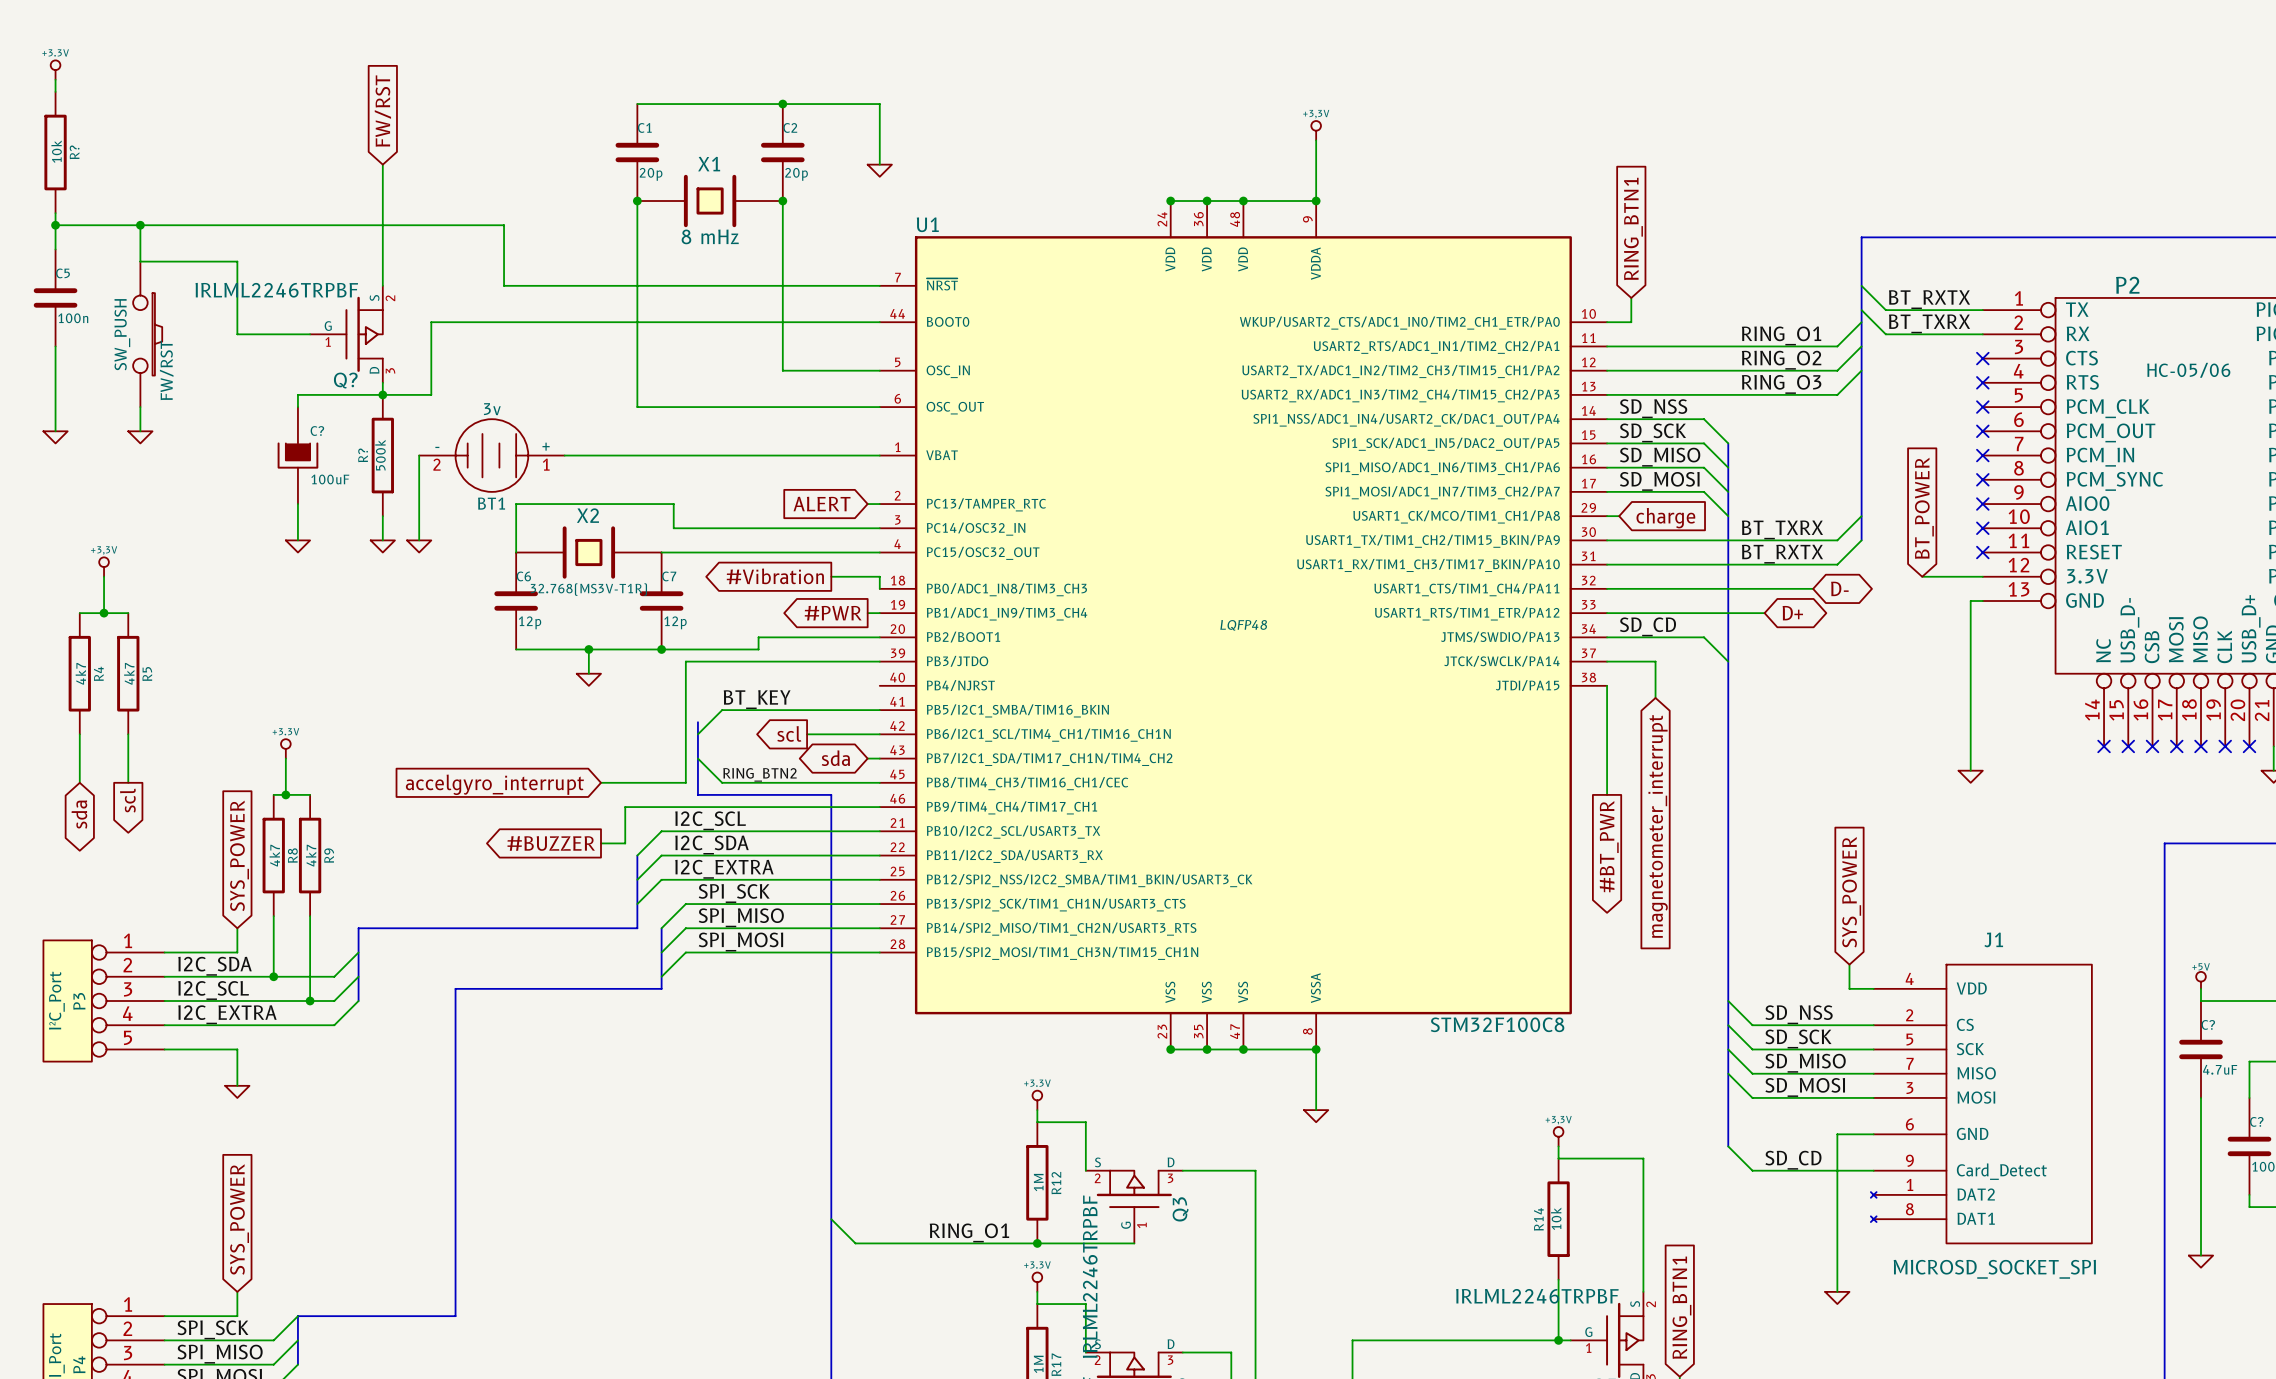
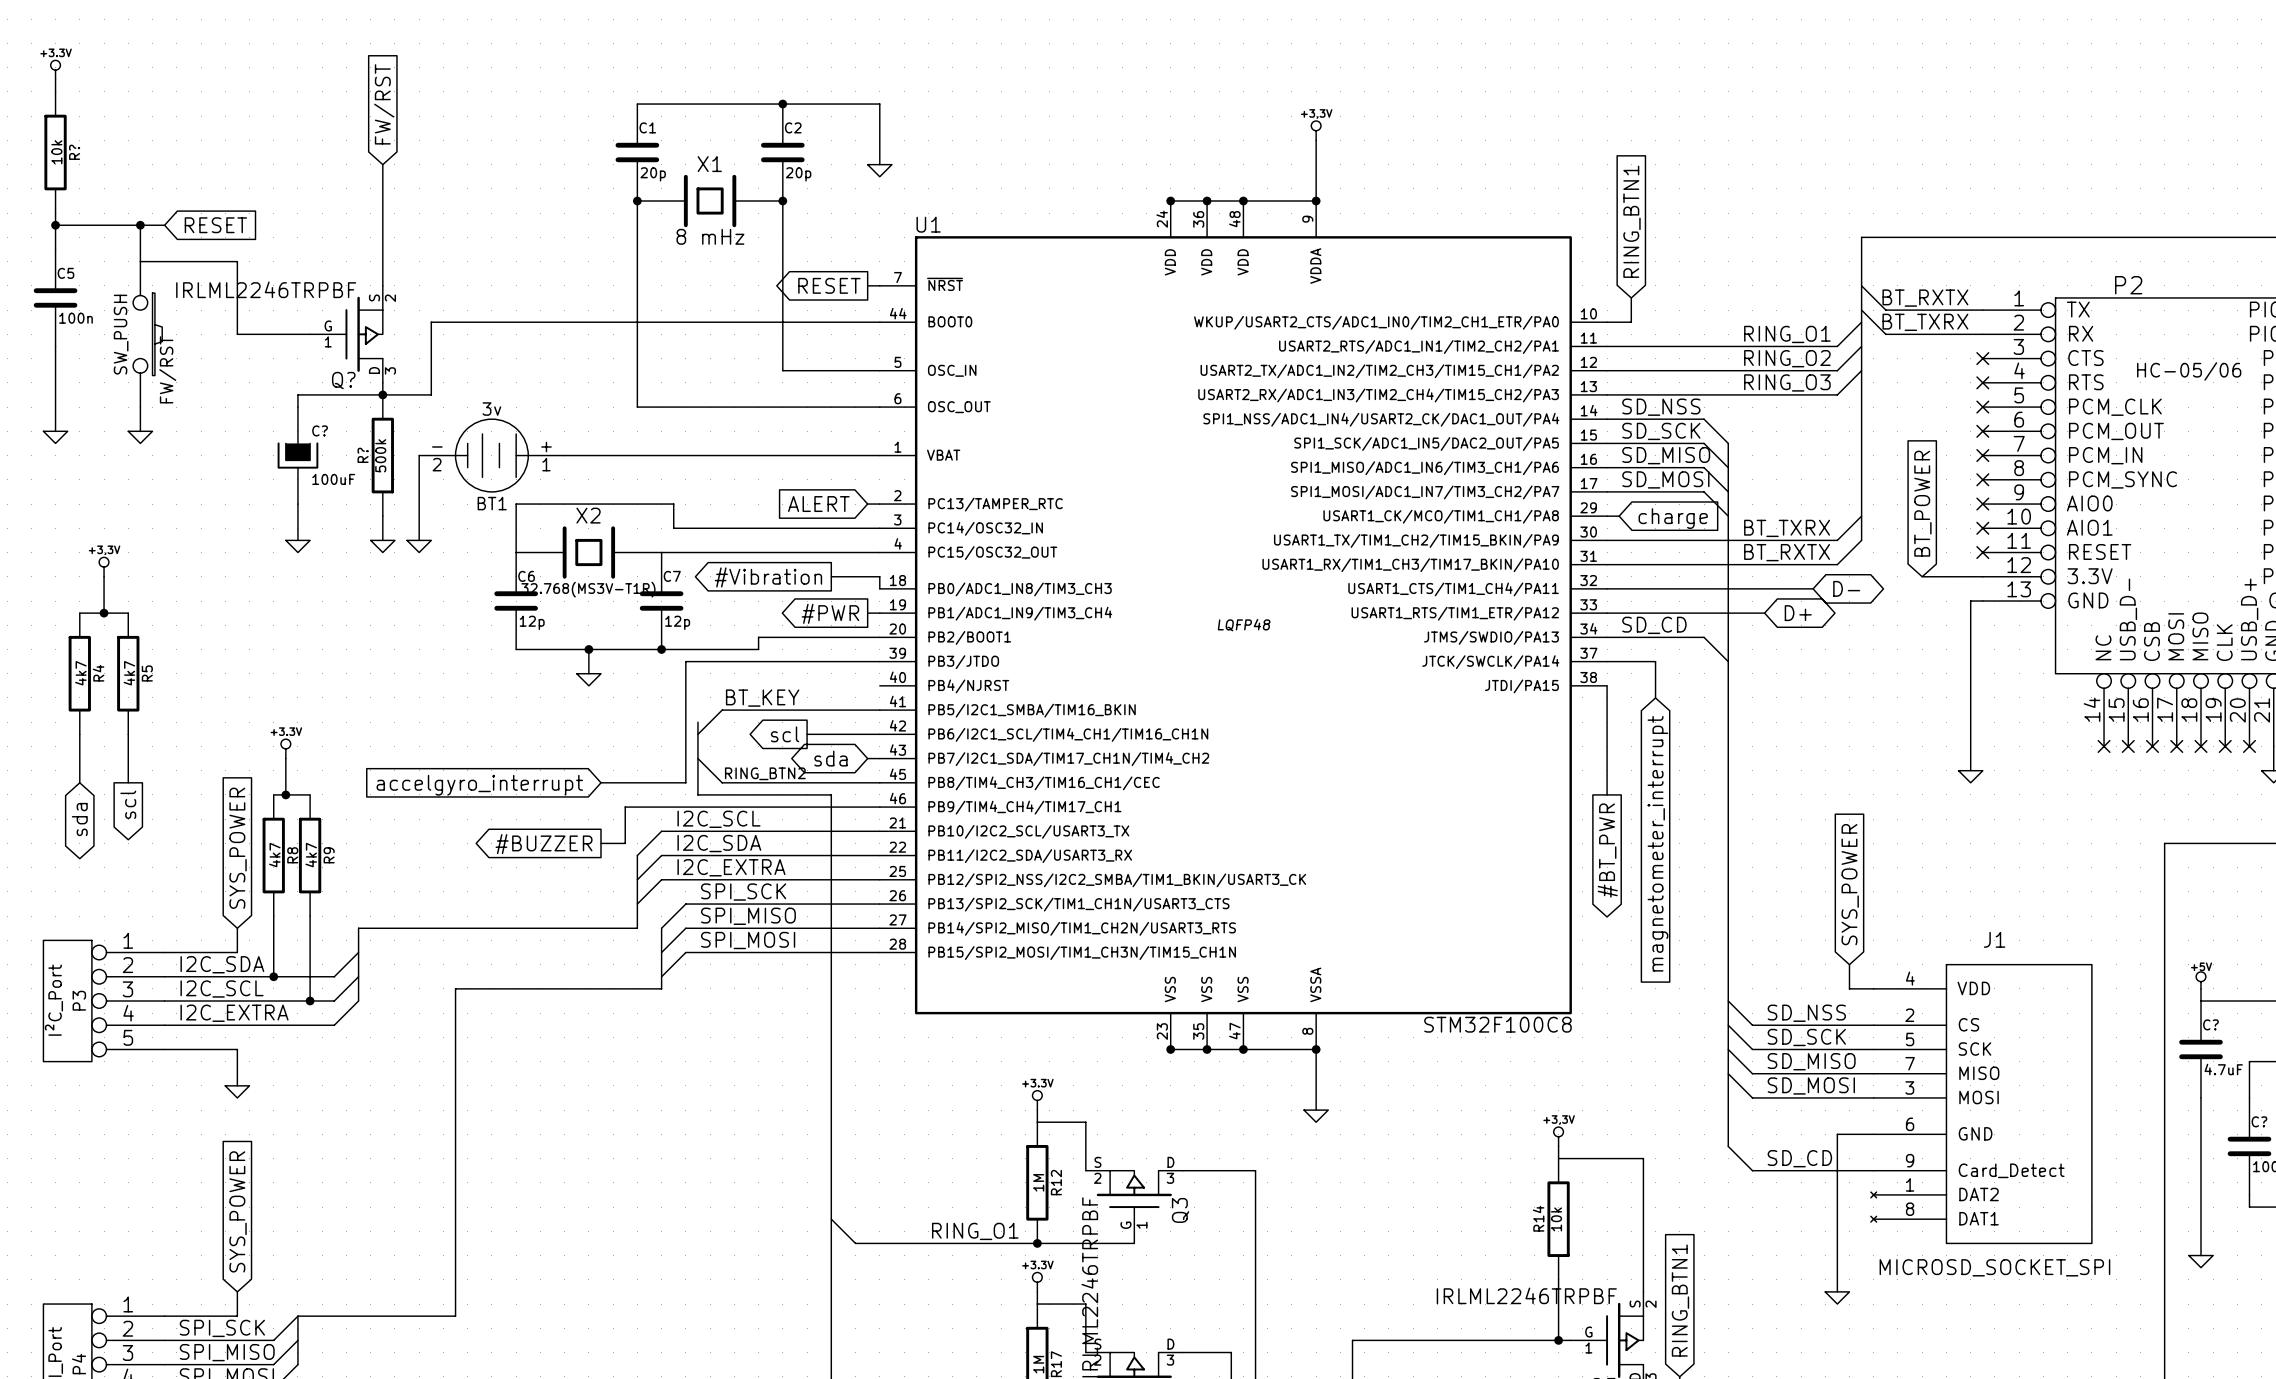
wire: (164, 225) (504, 225) (504, 285) (867, 285) -> none
global label: none -> RESET (215, 225)
global label: none -> RESET (829, 285)

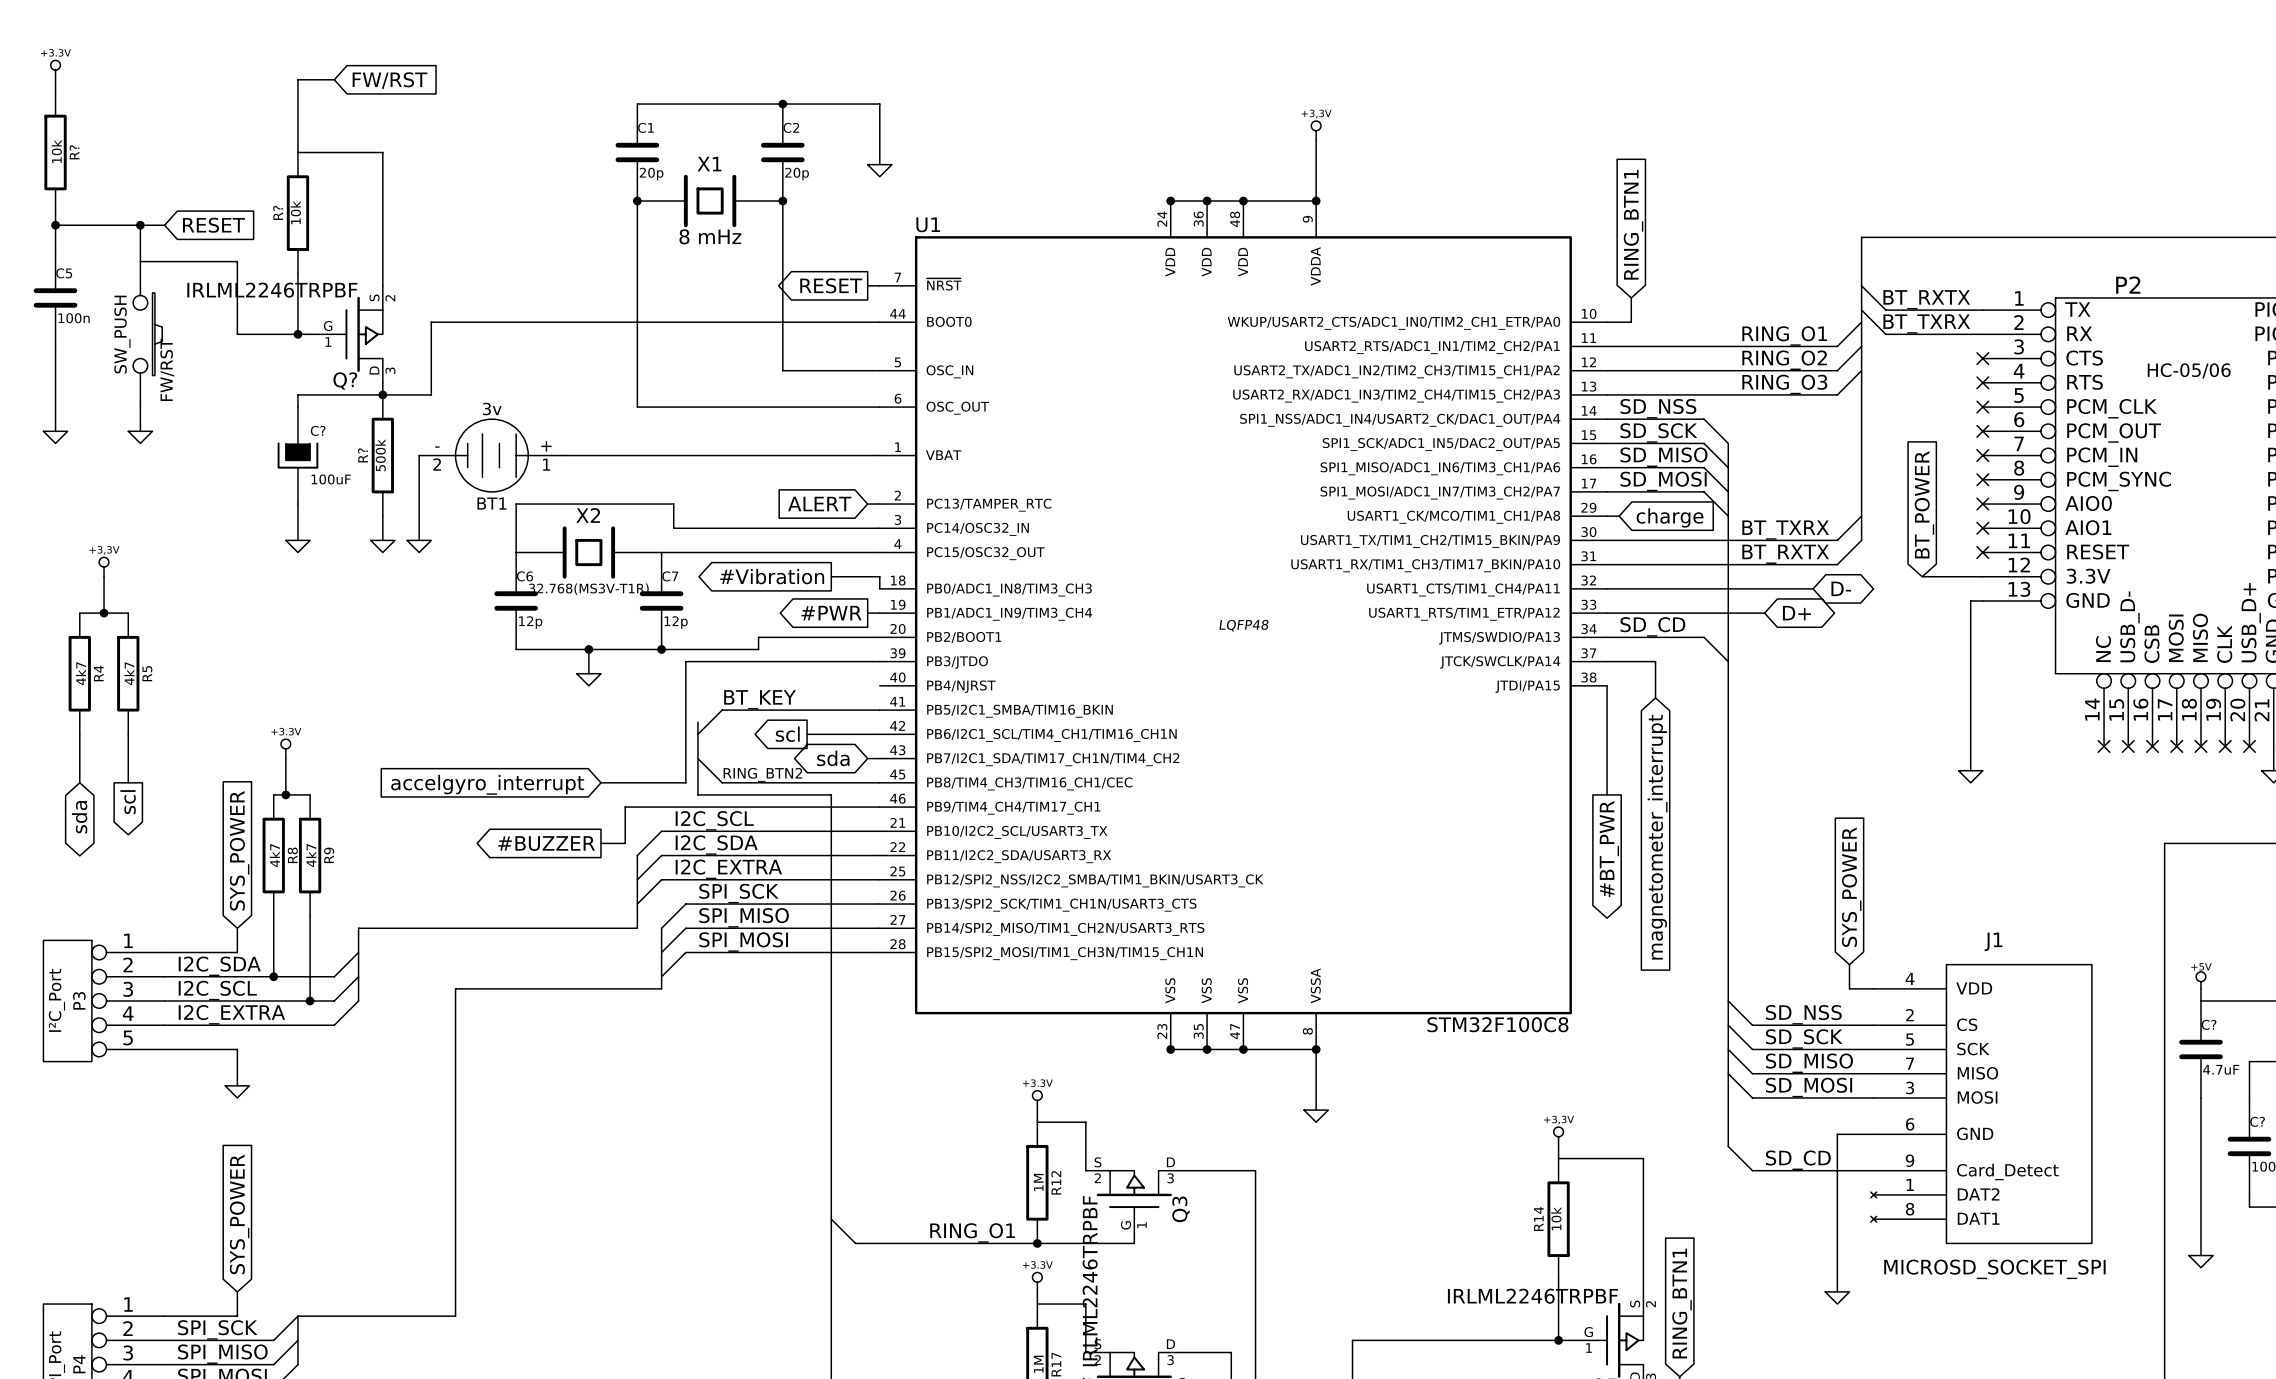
wire: none -> (334, 79) (297, 79) (297, 152) (382, 152) (382, 164)
global label rotation: 0° (384, 104) -> 90° clockwise (390, 80)
R?: none -> 10k (297, 213)
wire: none -> (297, 273) (297, 334)
junction: none -> (297, 334)

